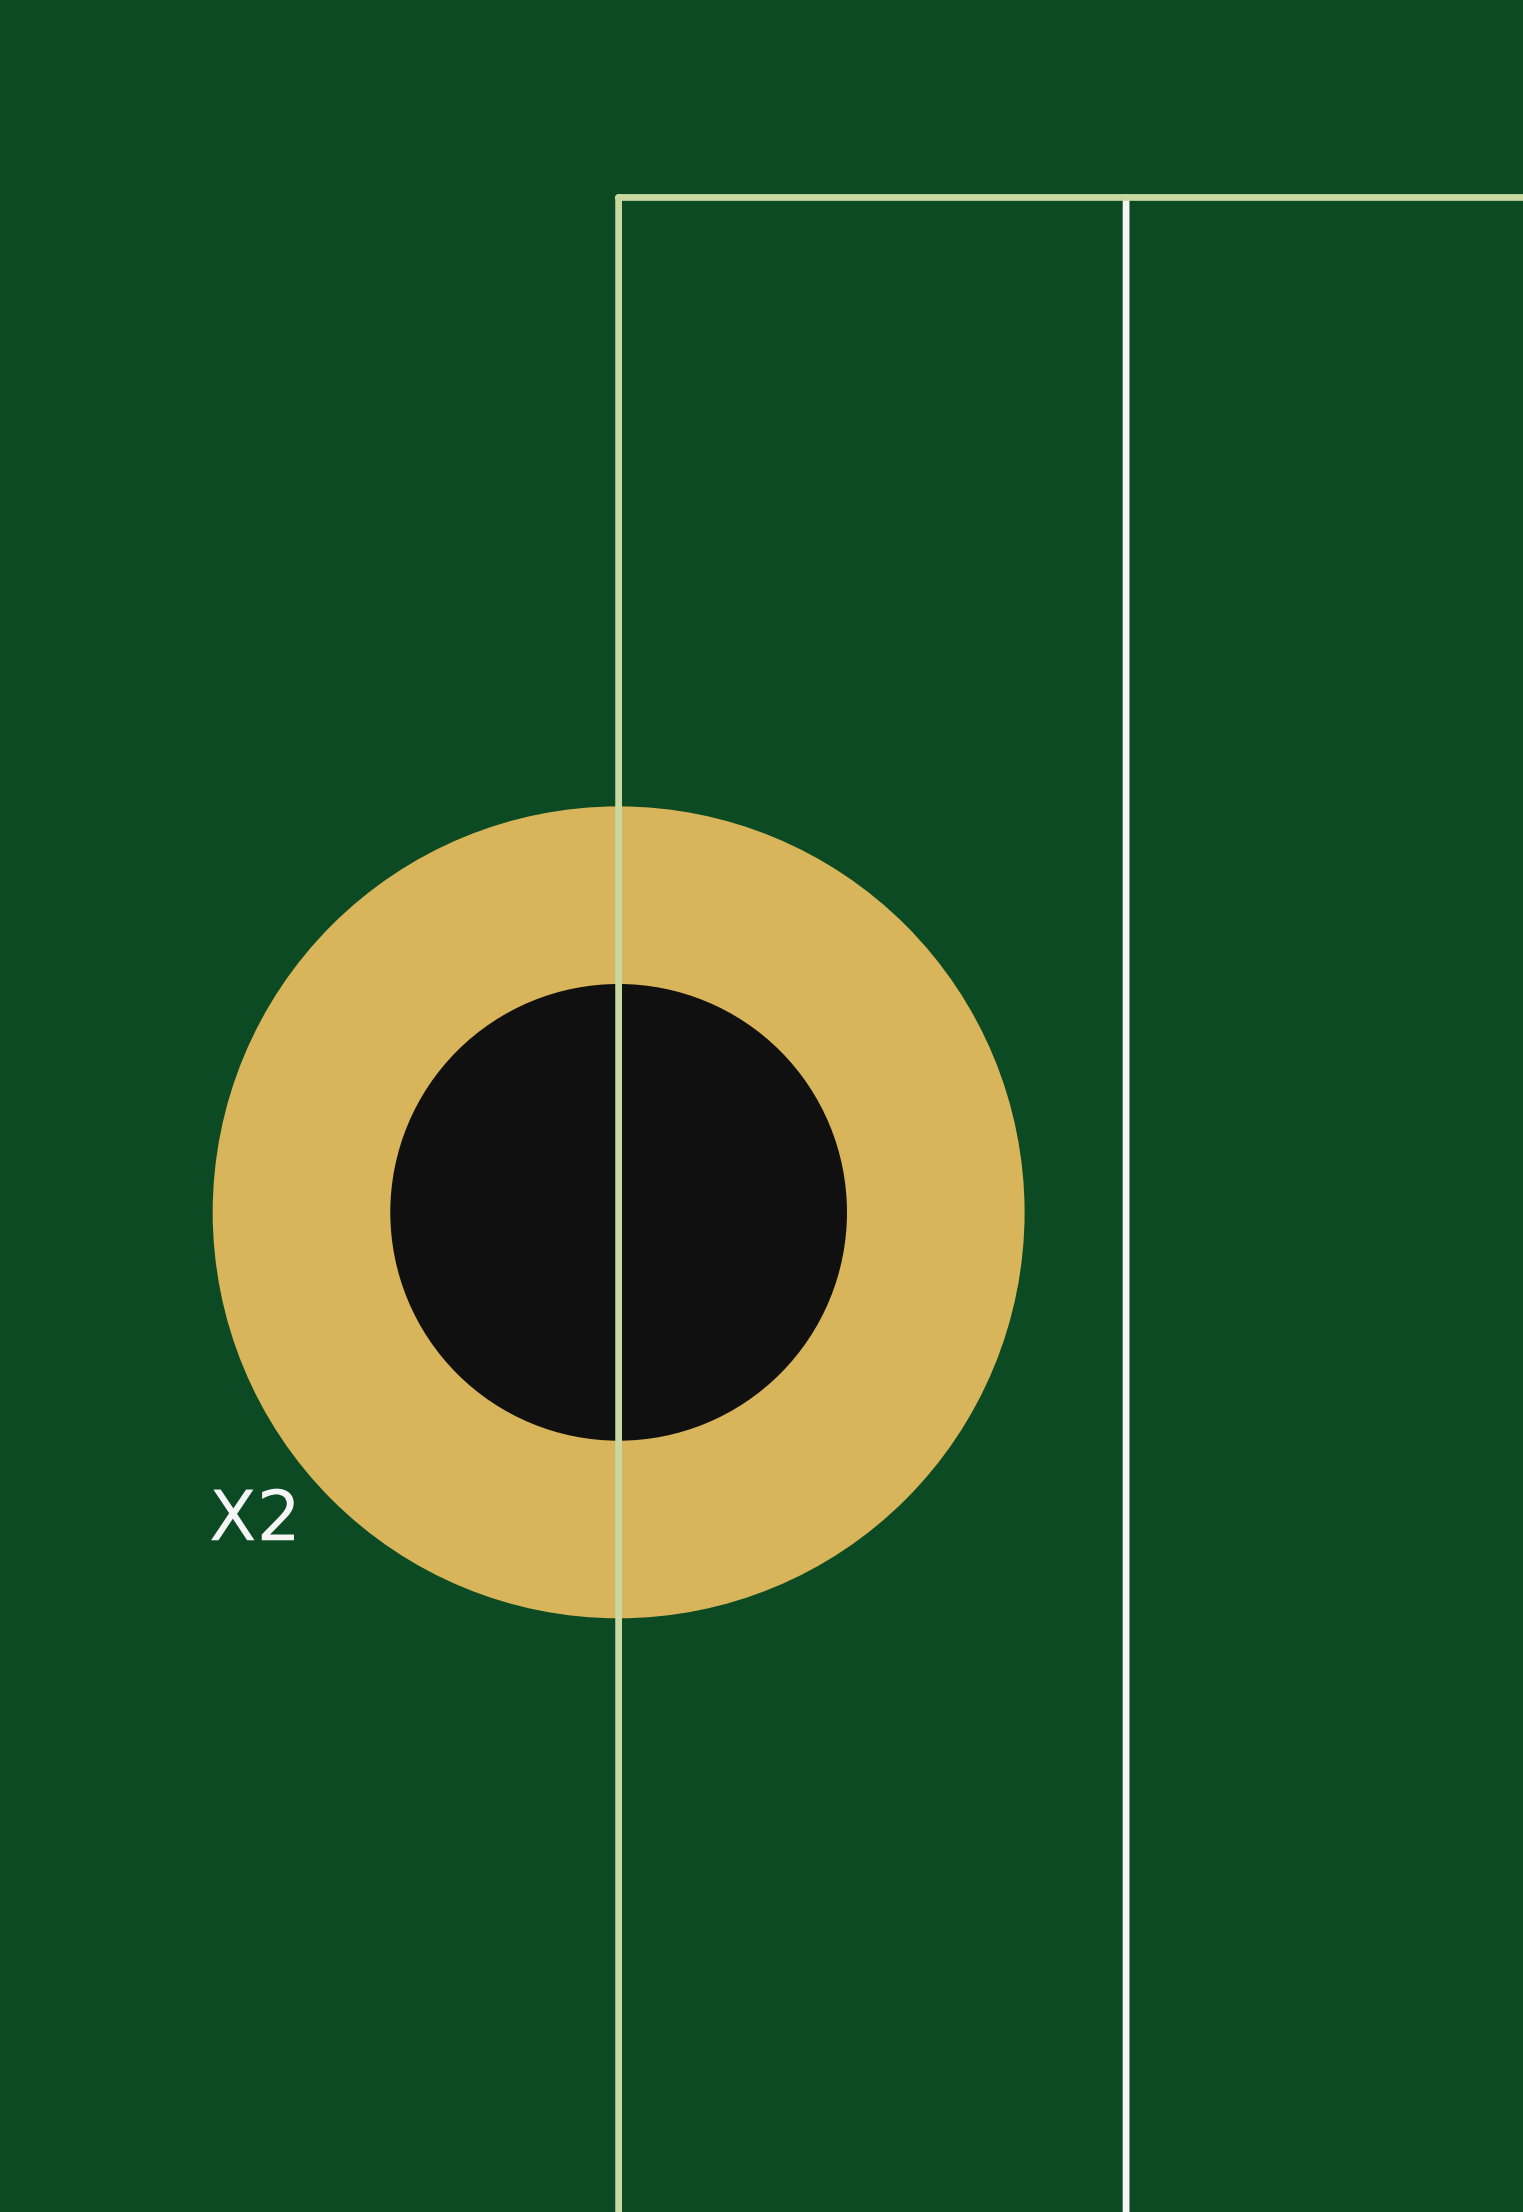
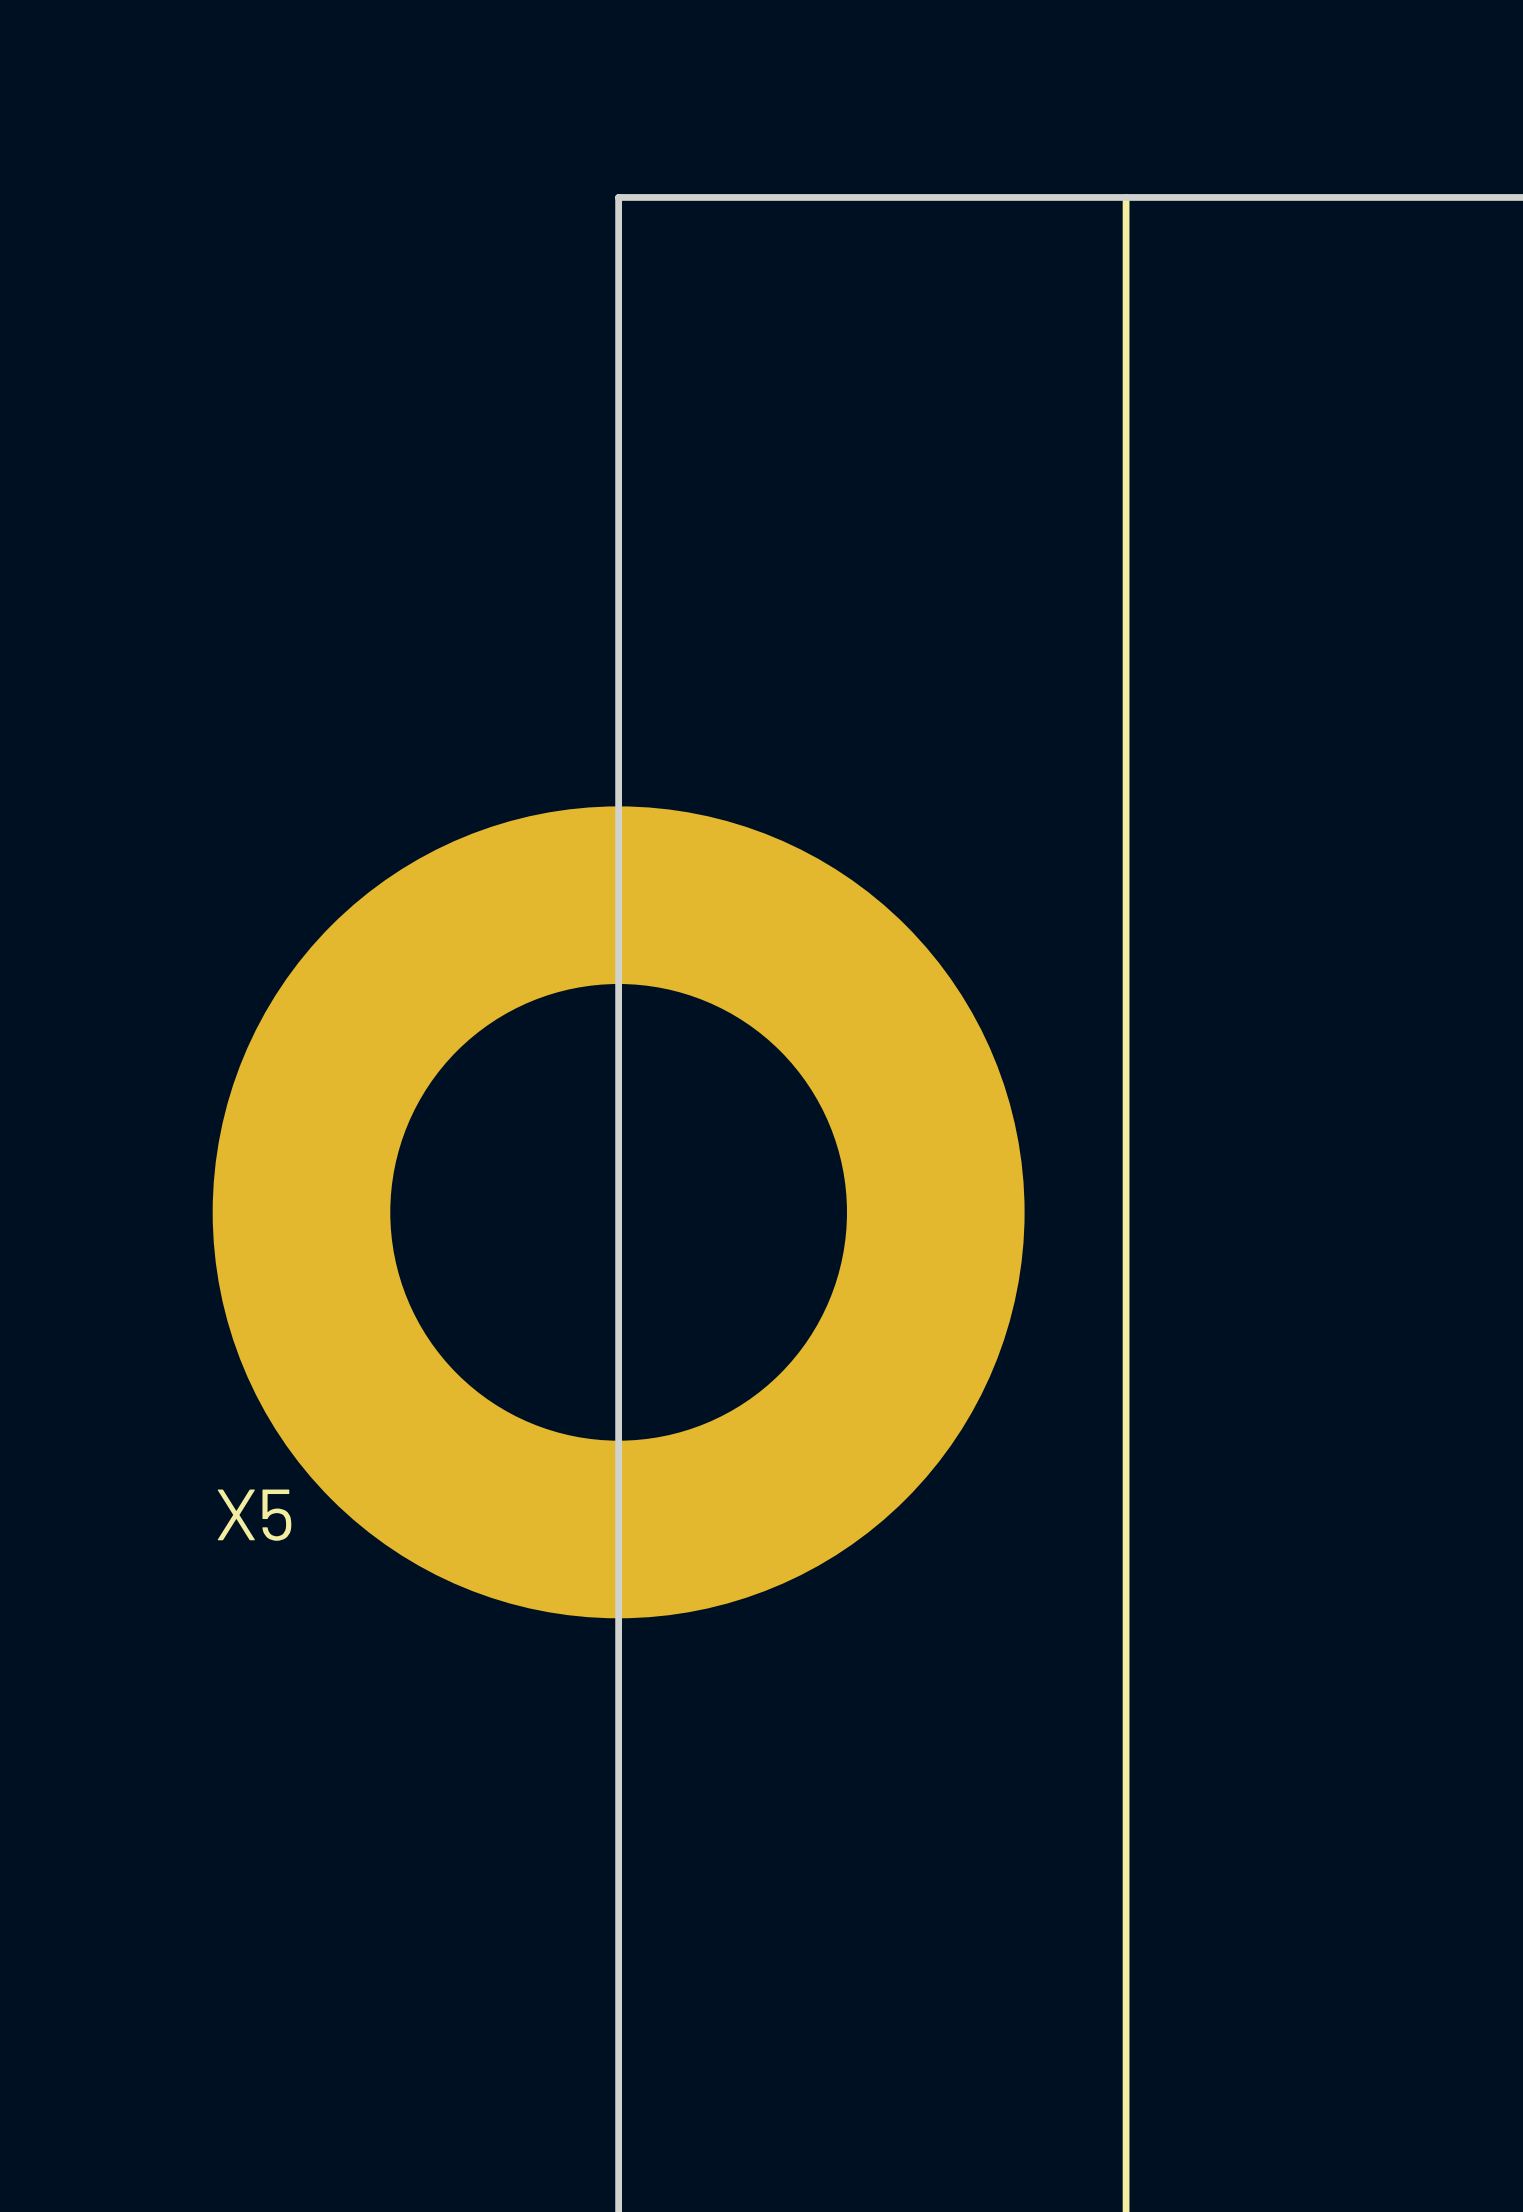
X2 name: X2 (252, 1514) -> X5 (254, 1515)

